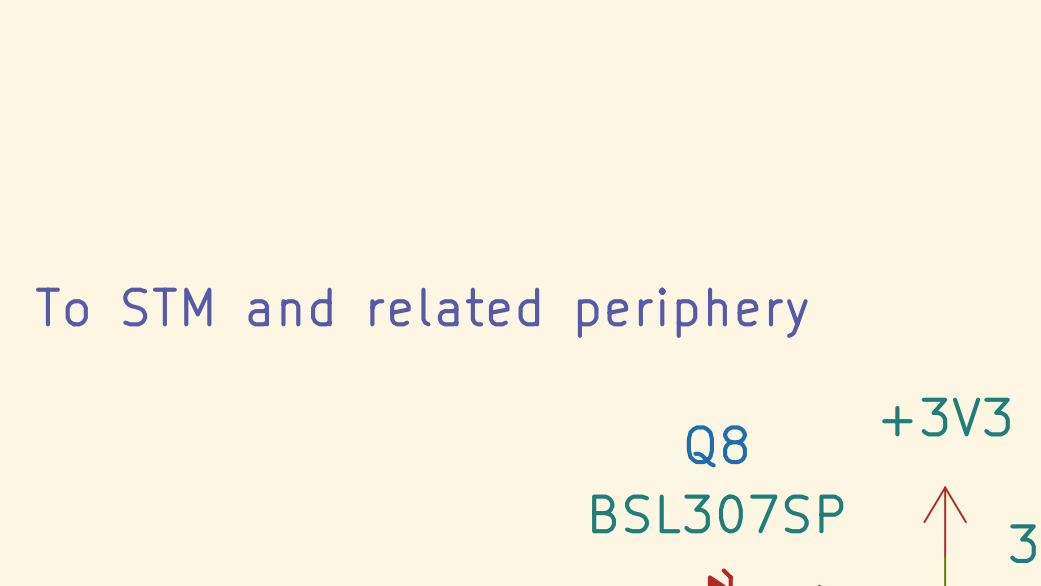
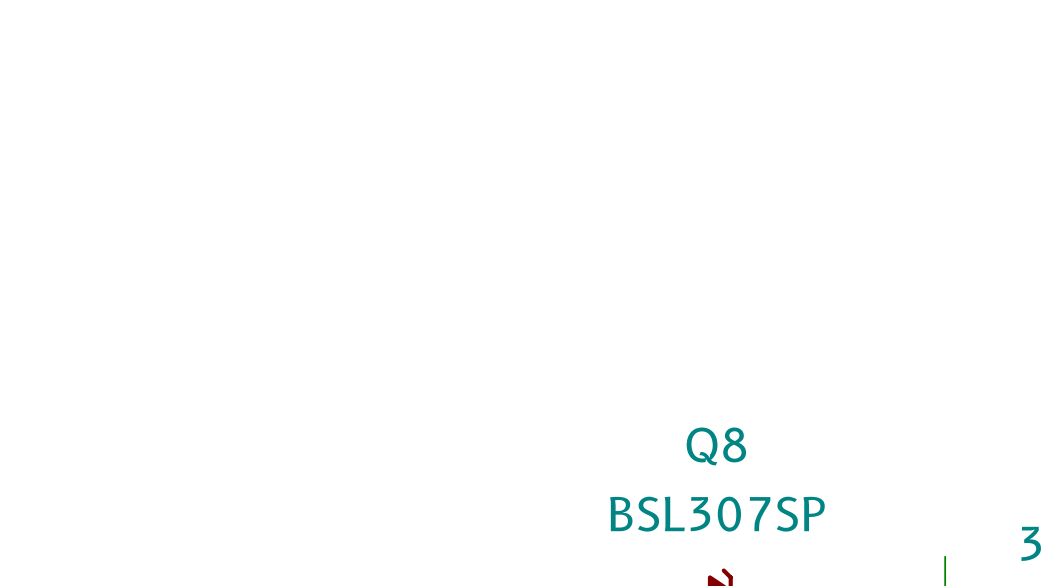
text: To STM and related periphery (421, 312) -> none
power symbol: +3V3 (945, 522) -> none

